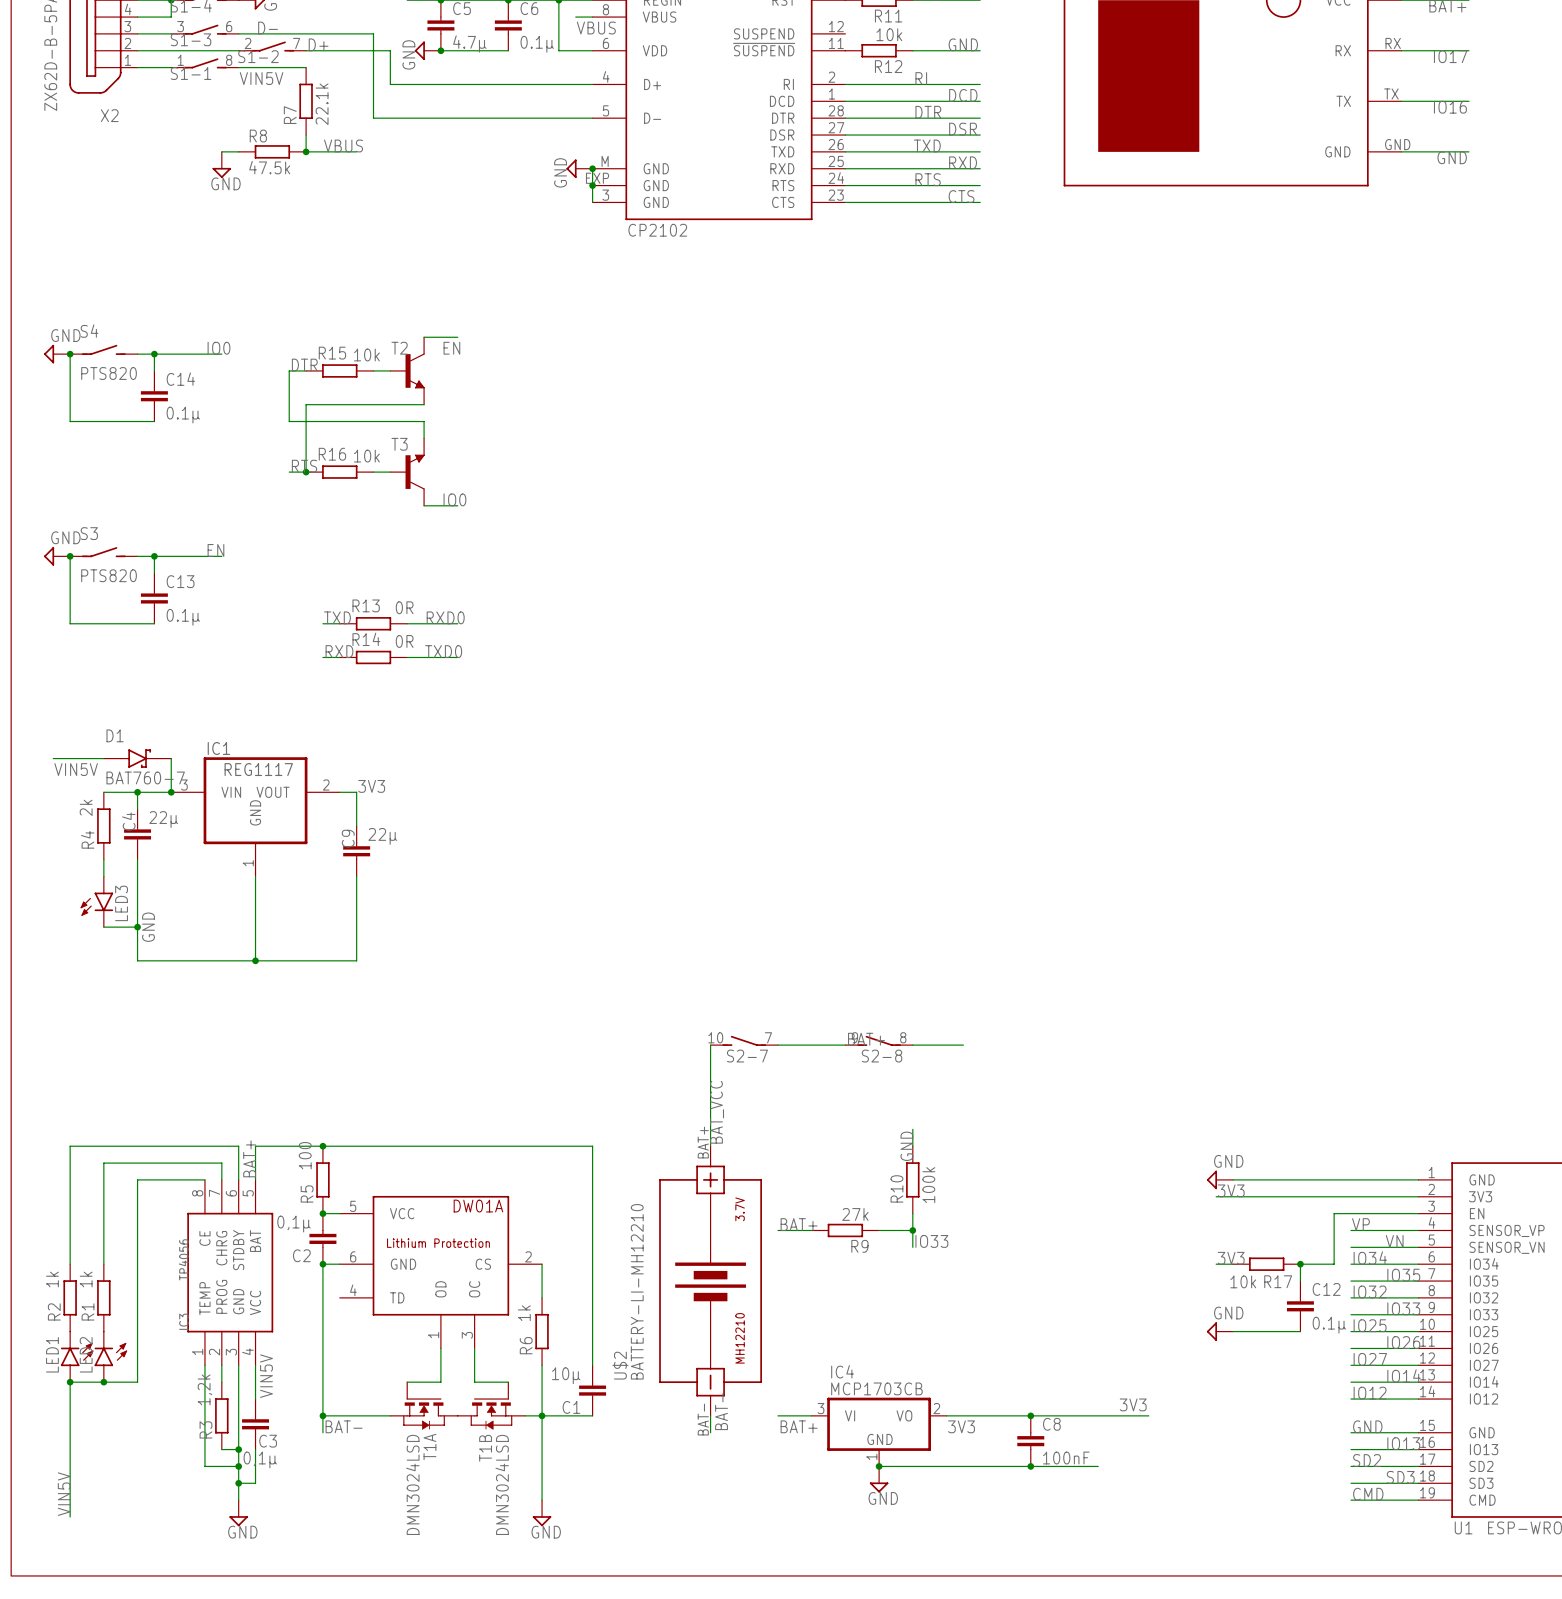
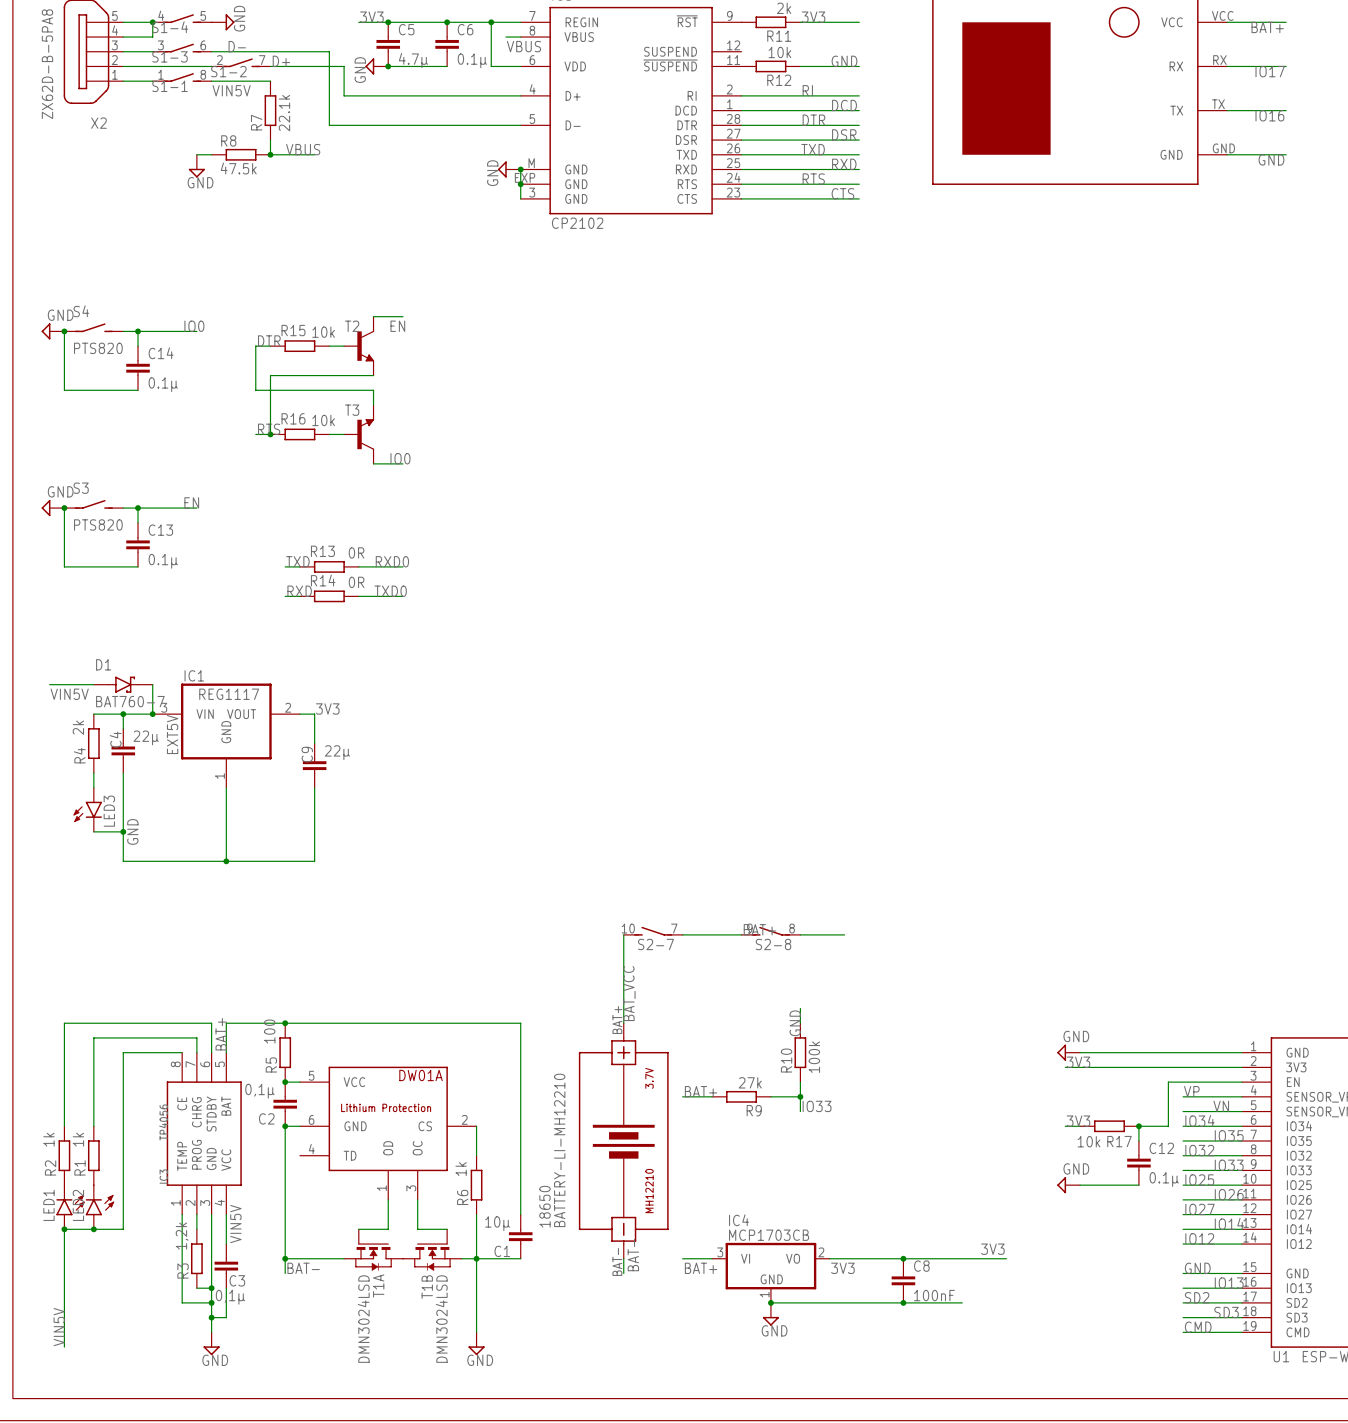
label: none -> EXT5V (172, 734)
U$2 name: U$2 (620, 1365) -> 18650 (545, 1206)

